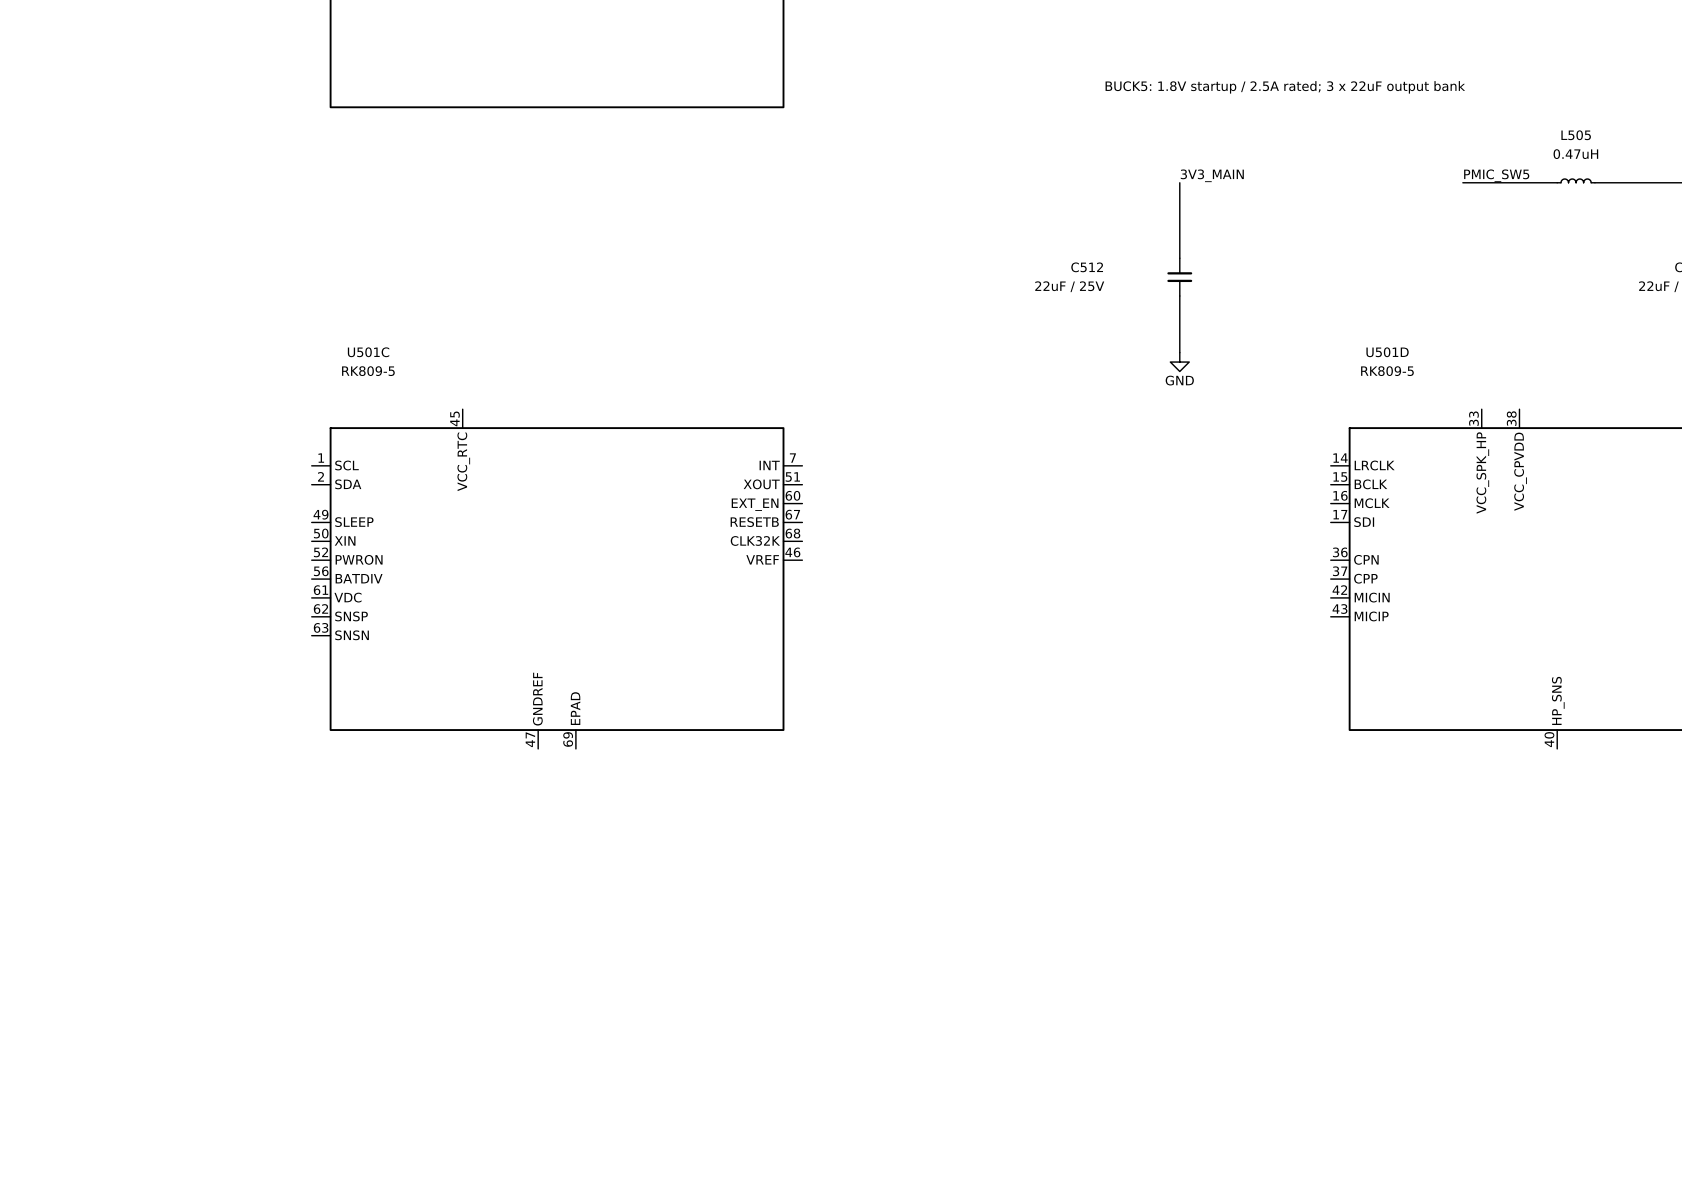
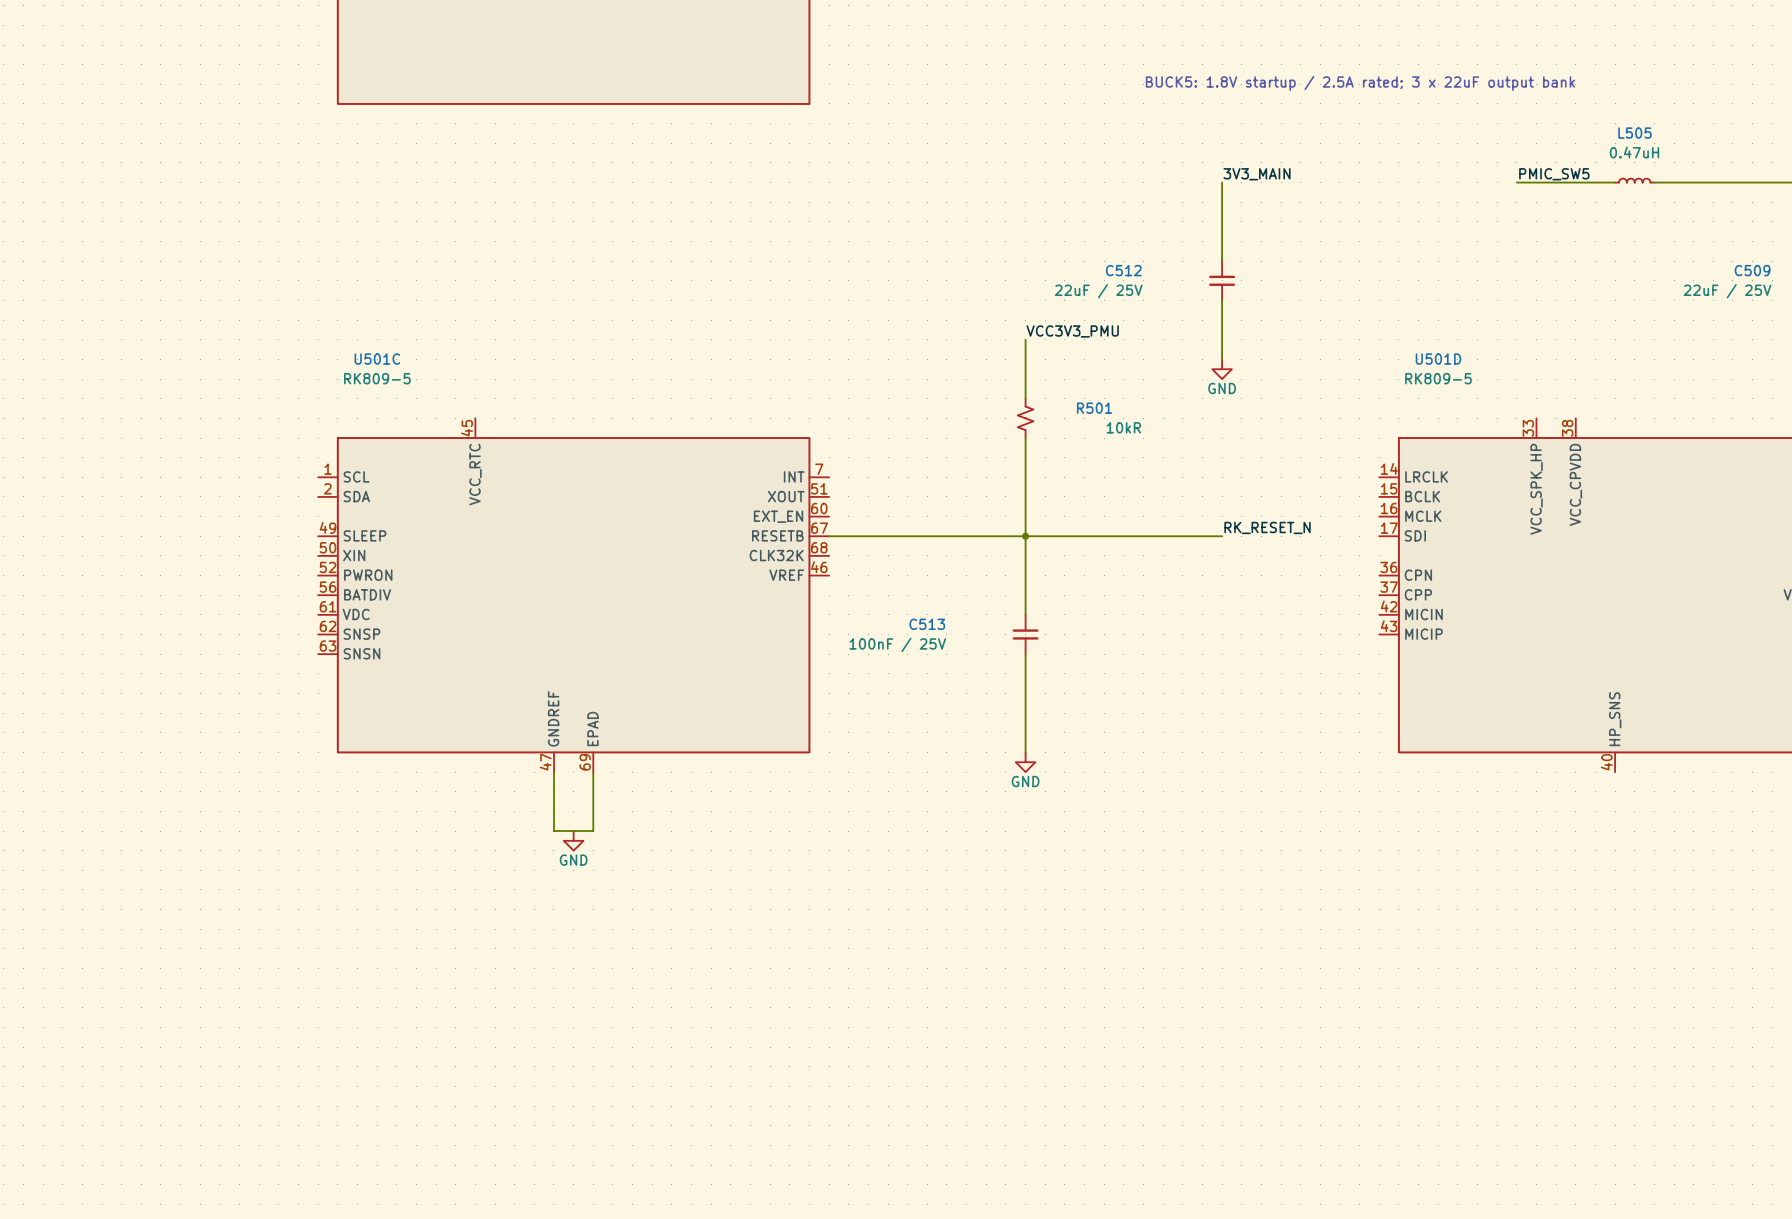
label: none -> VCC3V3_PMU (1072, 331)
wire: none -> (1025, 339) (1025, 398)
R501: none -> 10kR (1025, 418)
wire: none -> (1025, 438) (1025, 614)
label: none -> RK_RESET_N (1267, 527)
wire: none -> (829, 536) (1222, 536)
junction: none -> (1025, 536)
C513: none -> 100nF / 25V (1025, 634)
wire: none -> (1025, 654) (1025, 752)
power symbol: none -> GND (1025, 762)
wire: none -> (553, 772) (553, 831) (593, 831) (593, 772)
power symbol: none -> GND (573, 840)

